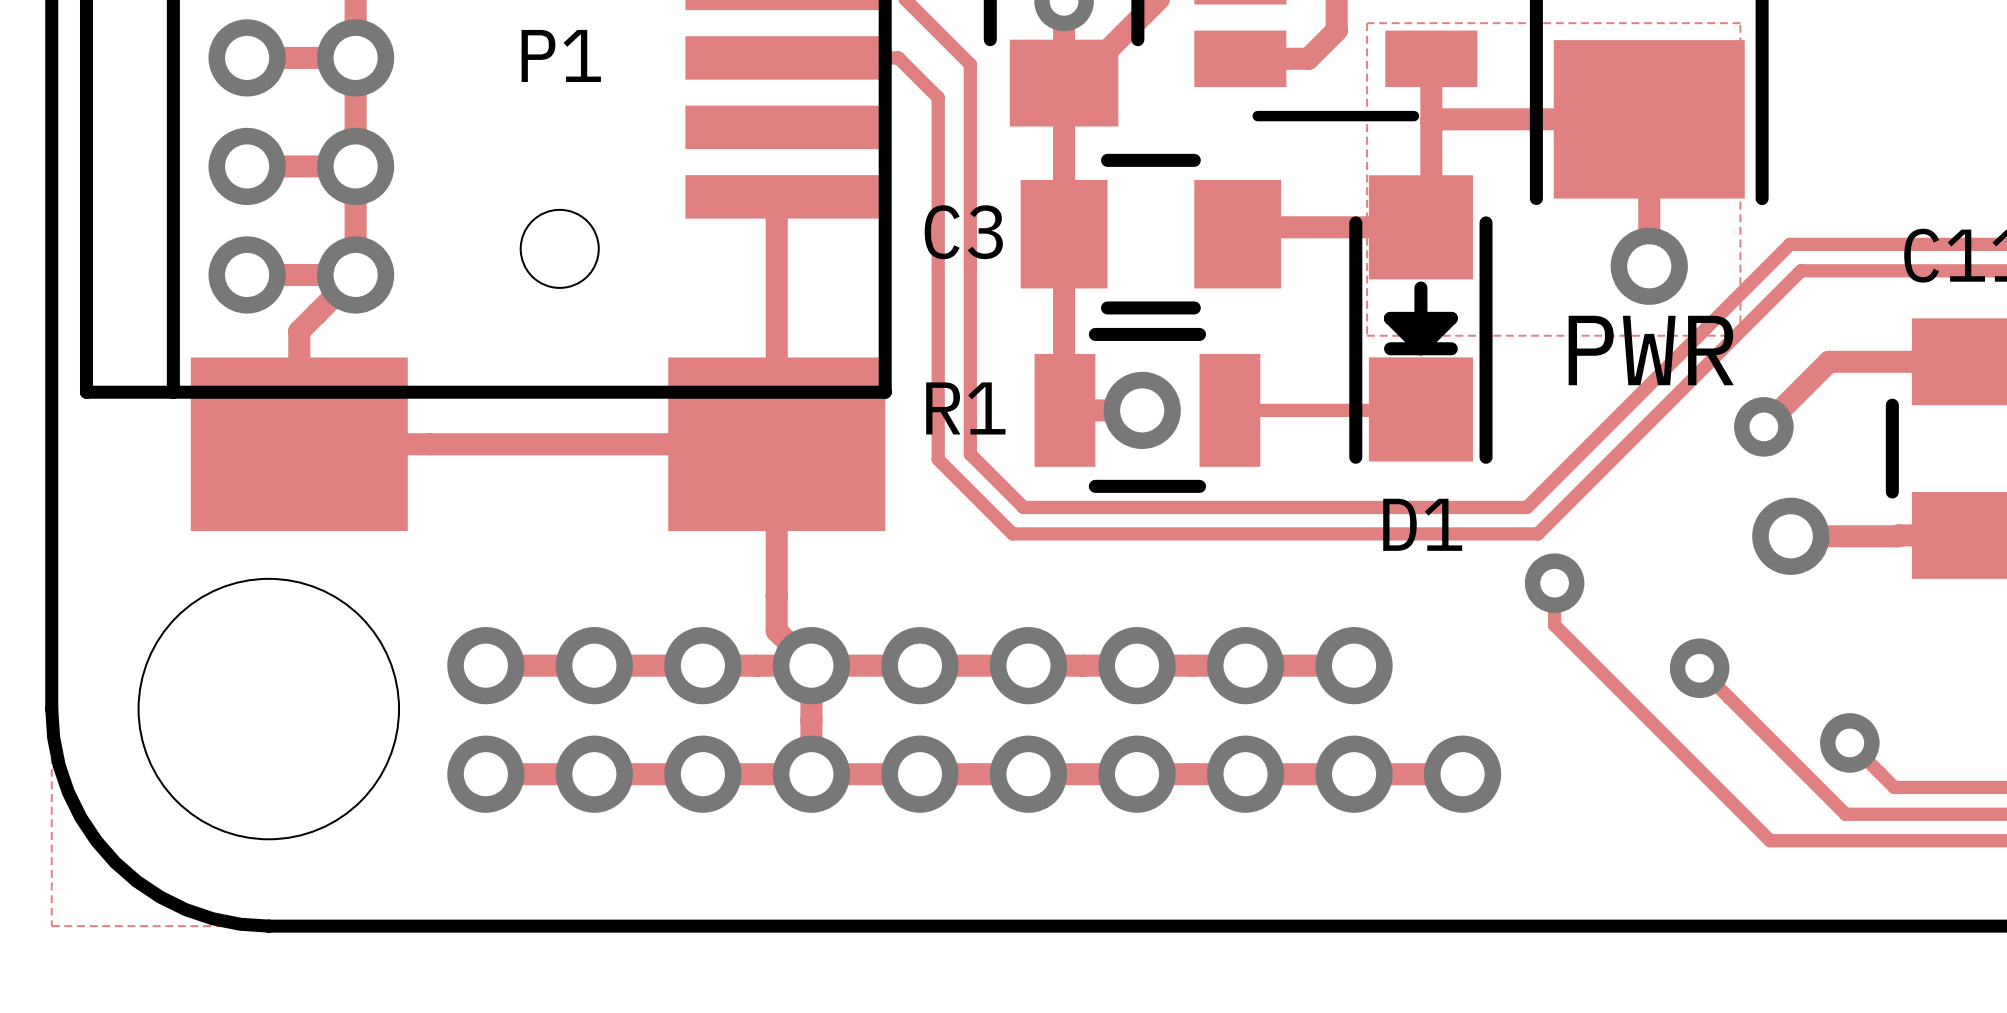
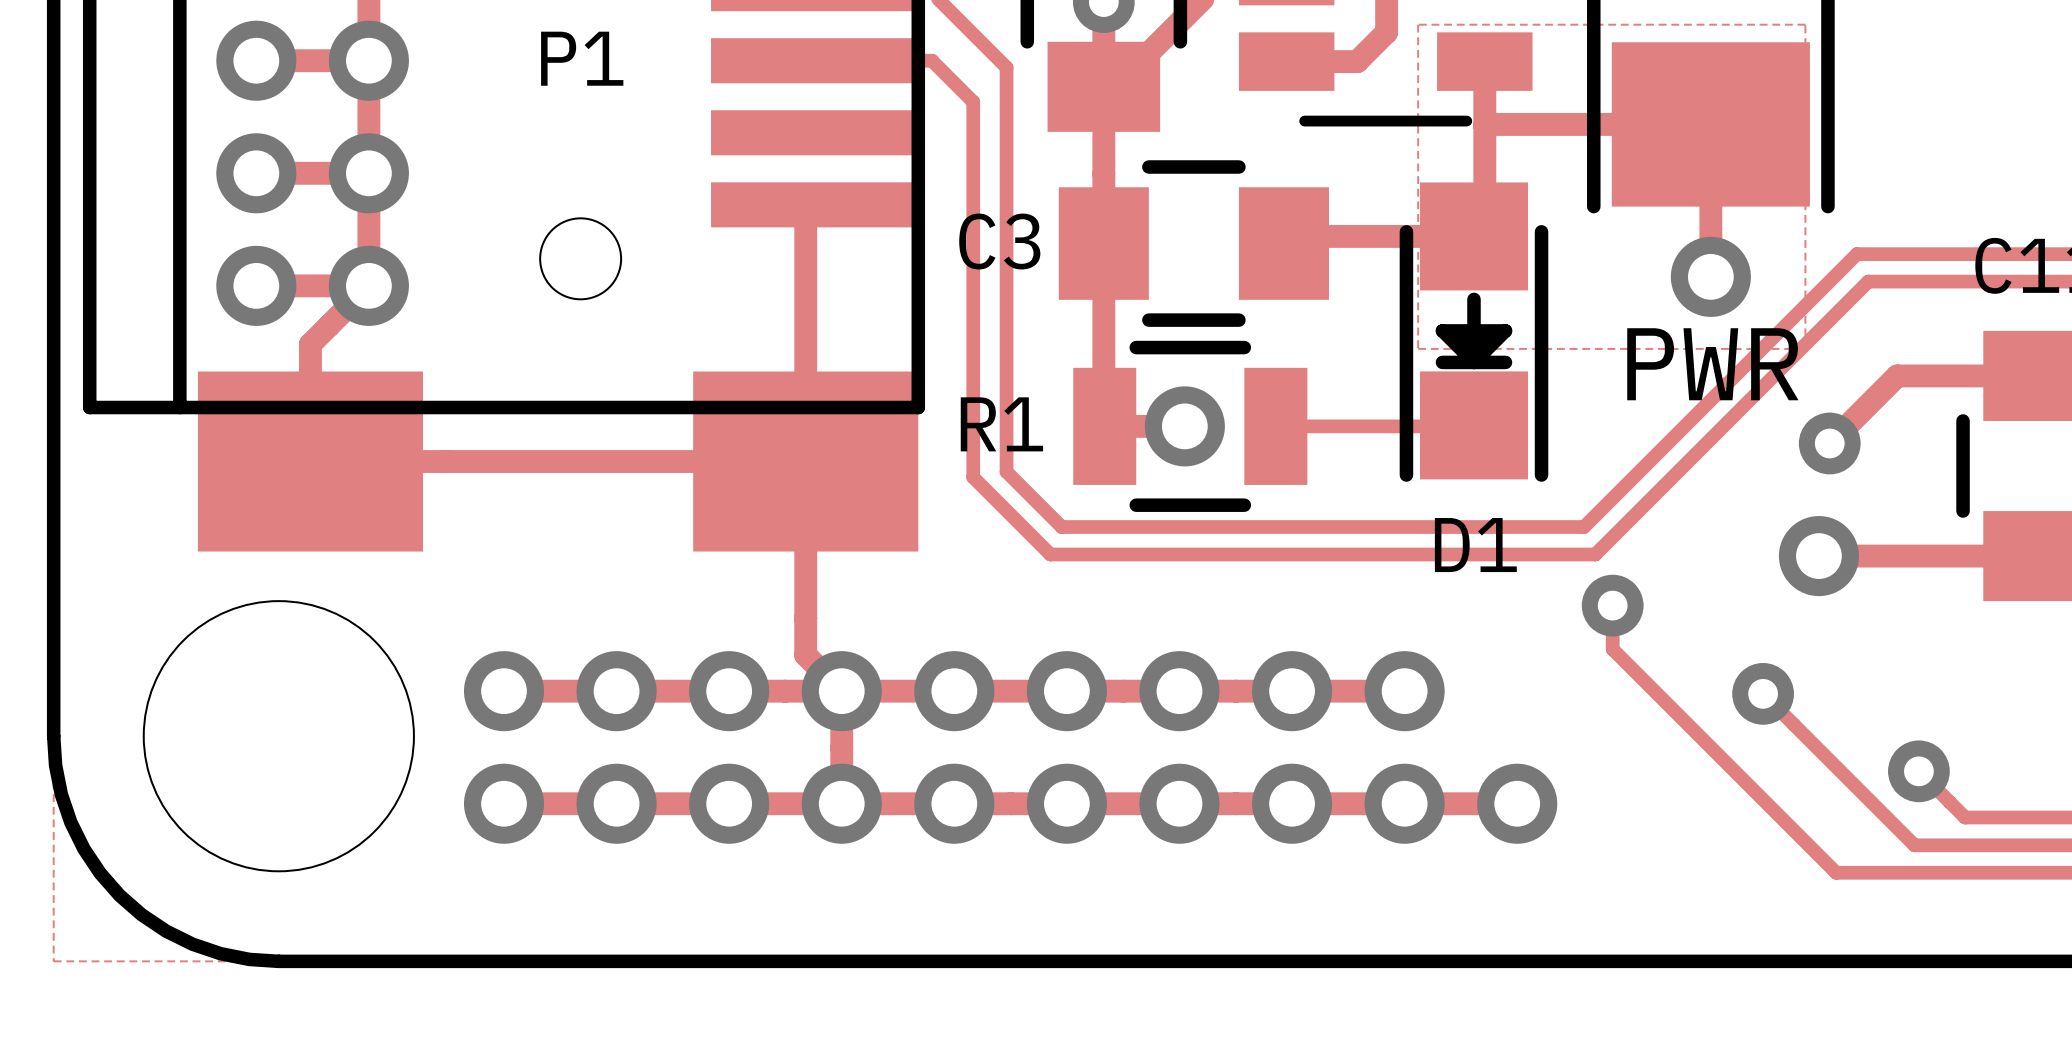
track: (1790, 536) (1897, 536) -> (1818, 556) (1969, 556)
via position: (1790, 536) -> (1818, 556)

